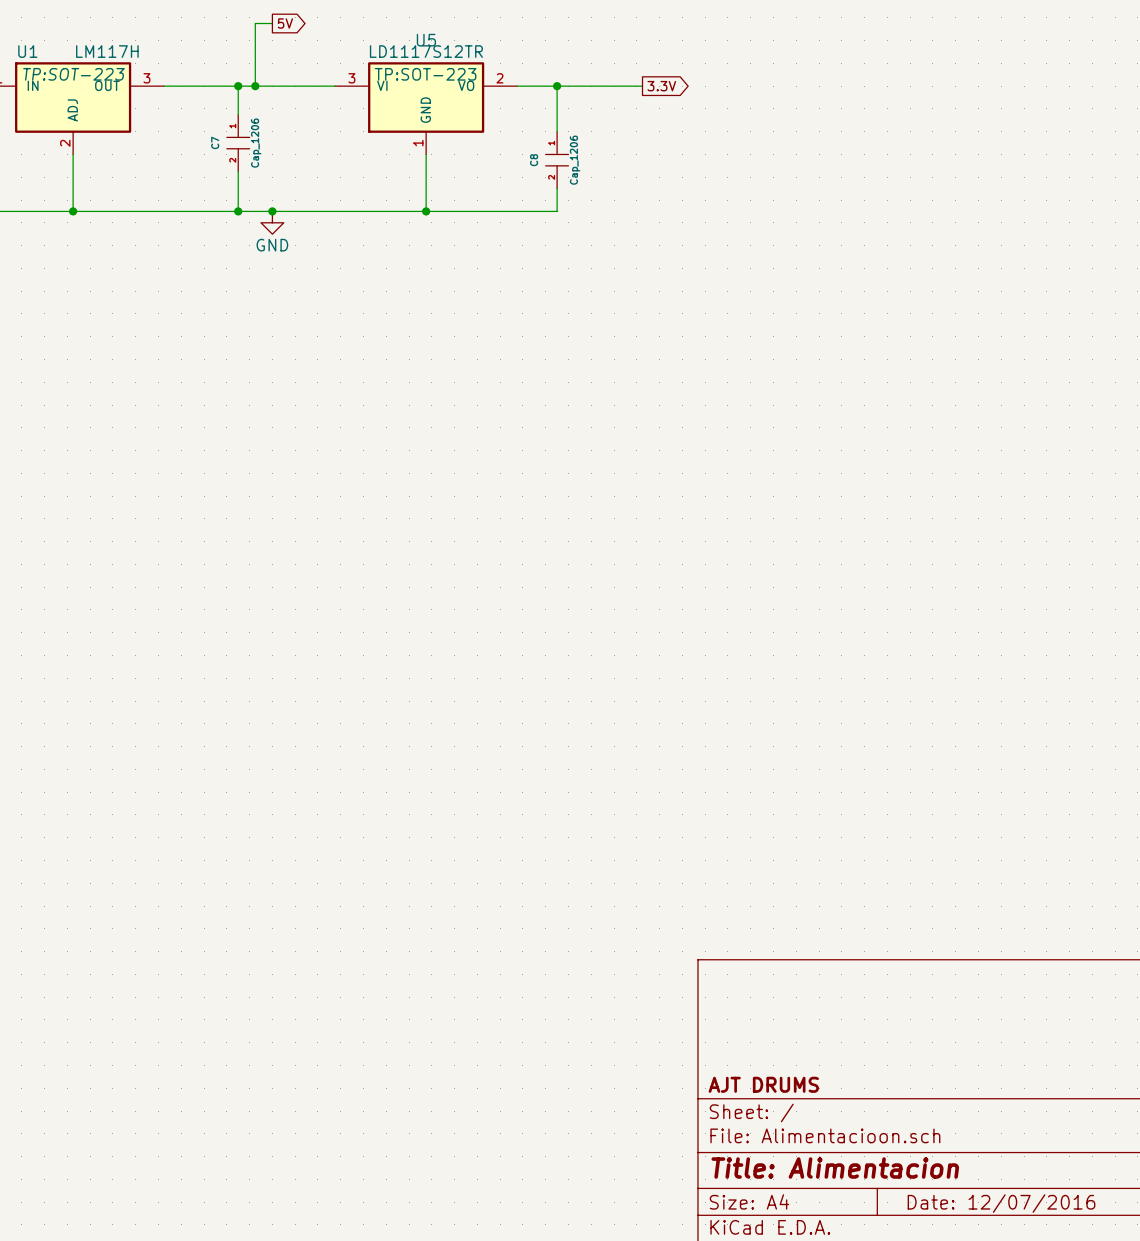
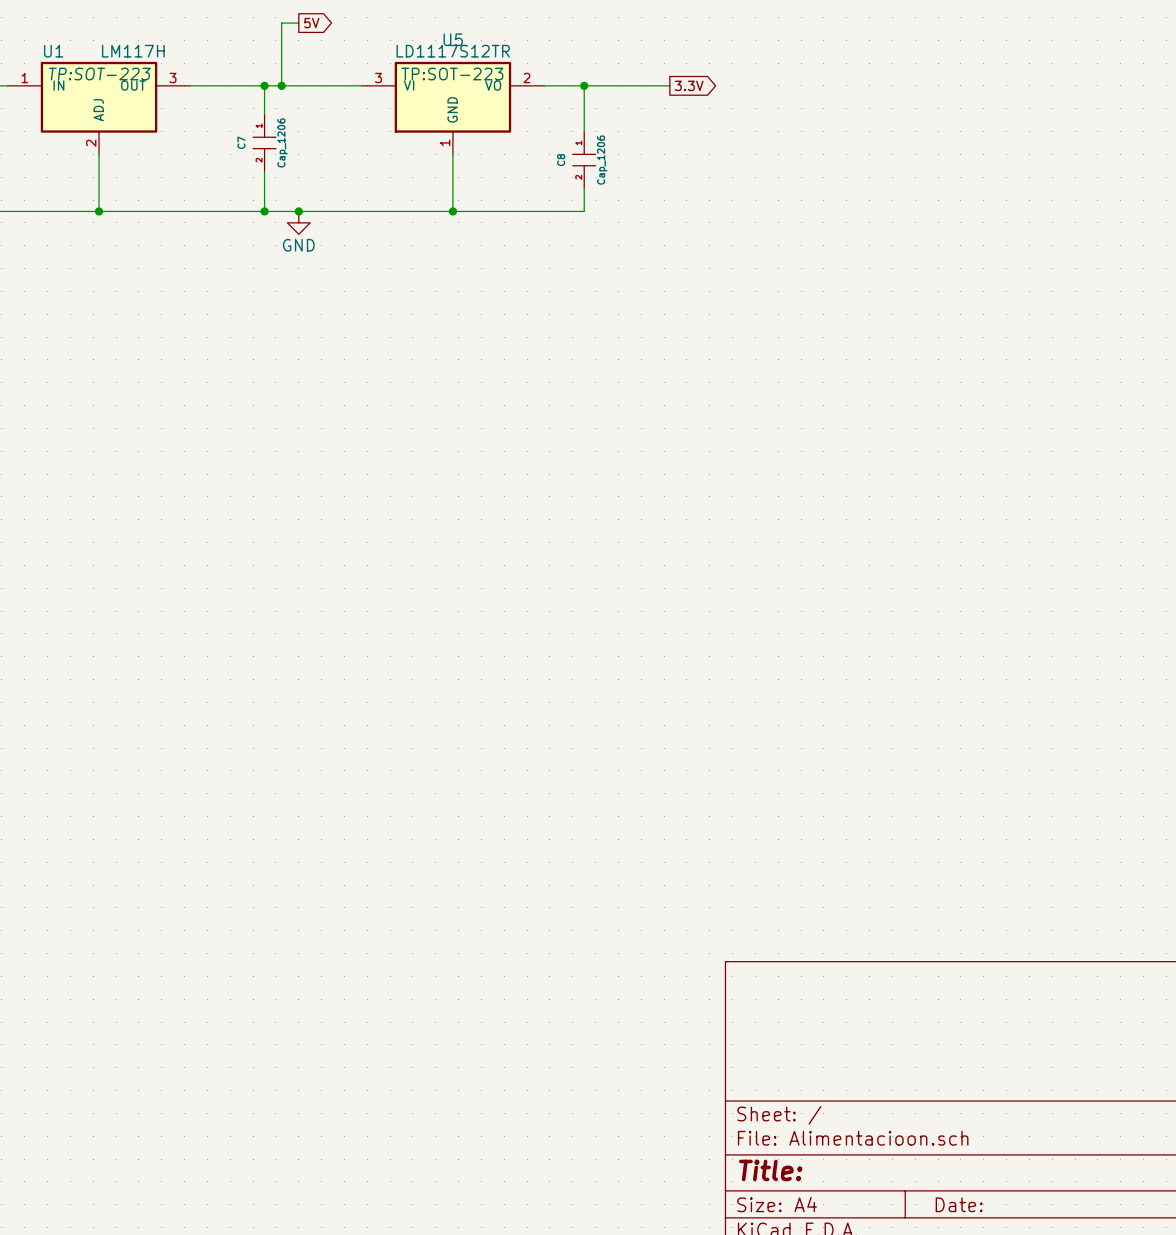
title block: AJT DRUMS (763, 1084) -> none
title block: Title: Alimentacion (835, 1168) -> Title: (770, 1170)
title block: Date: 12/07/2016 (1001, 1203) -> Date: (959, 1204)

